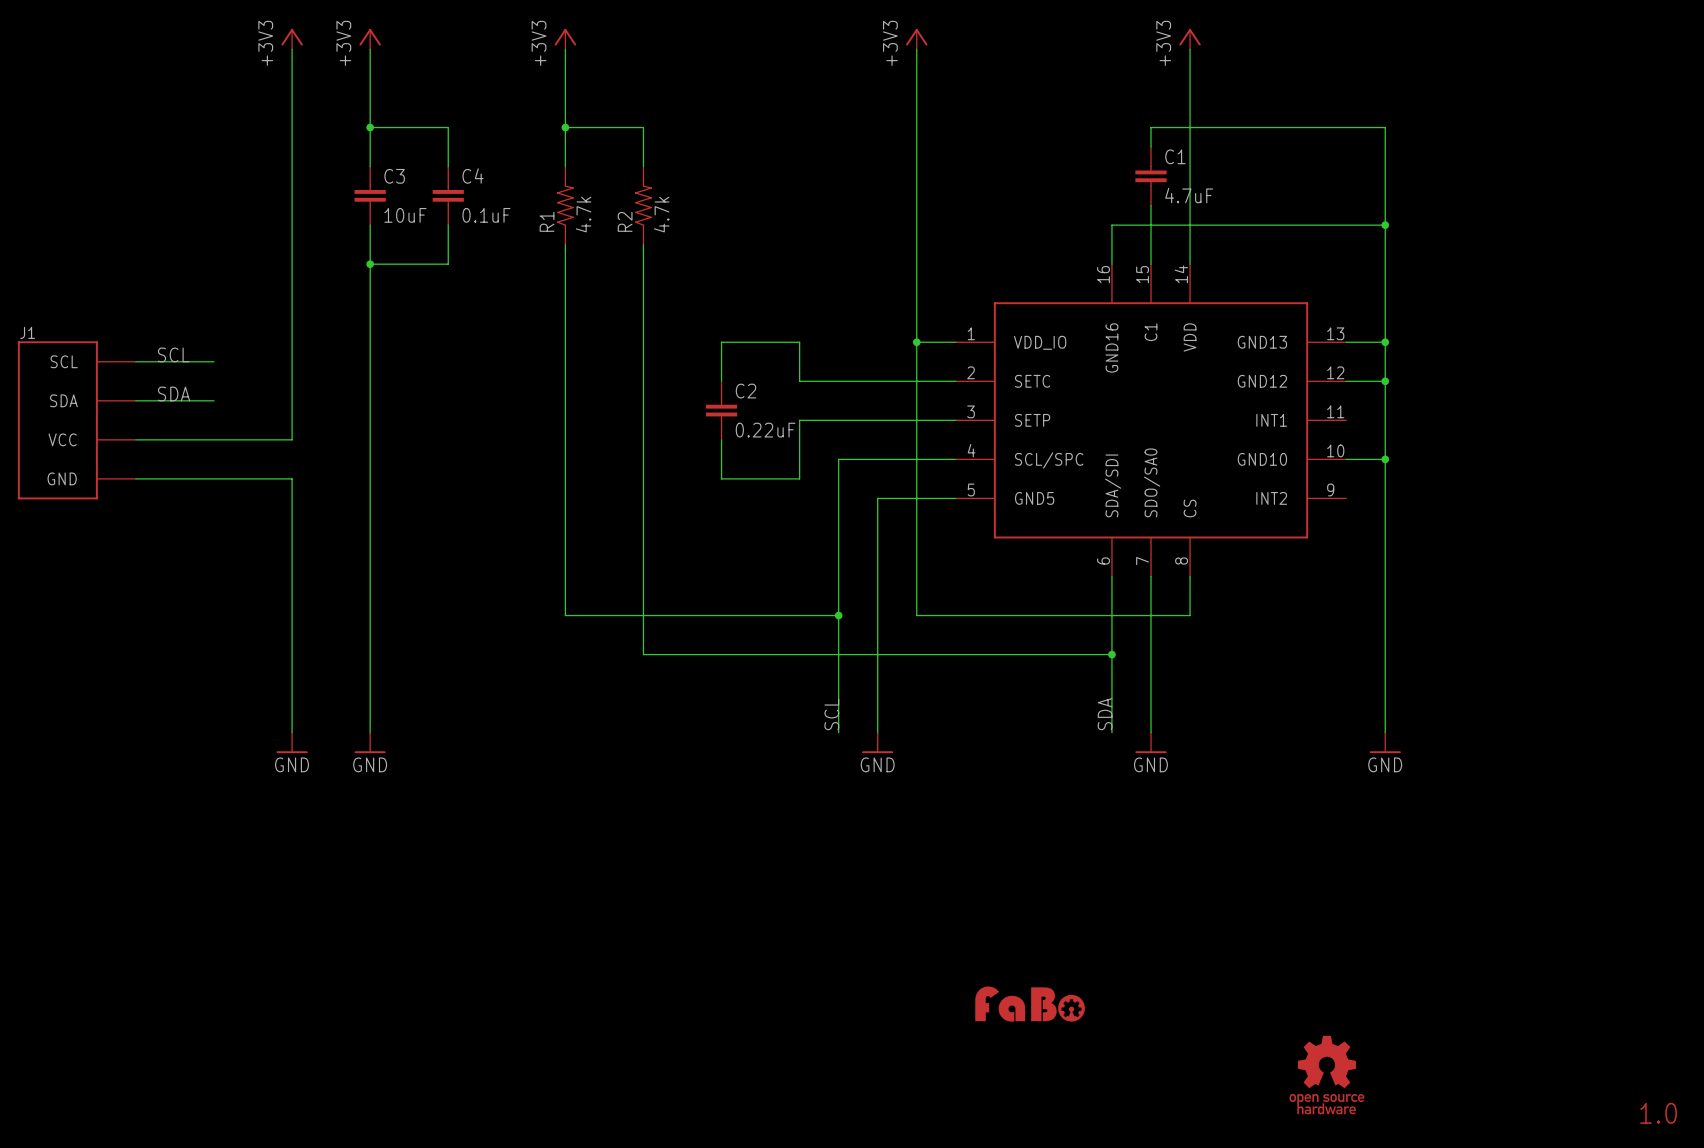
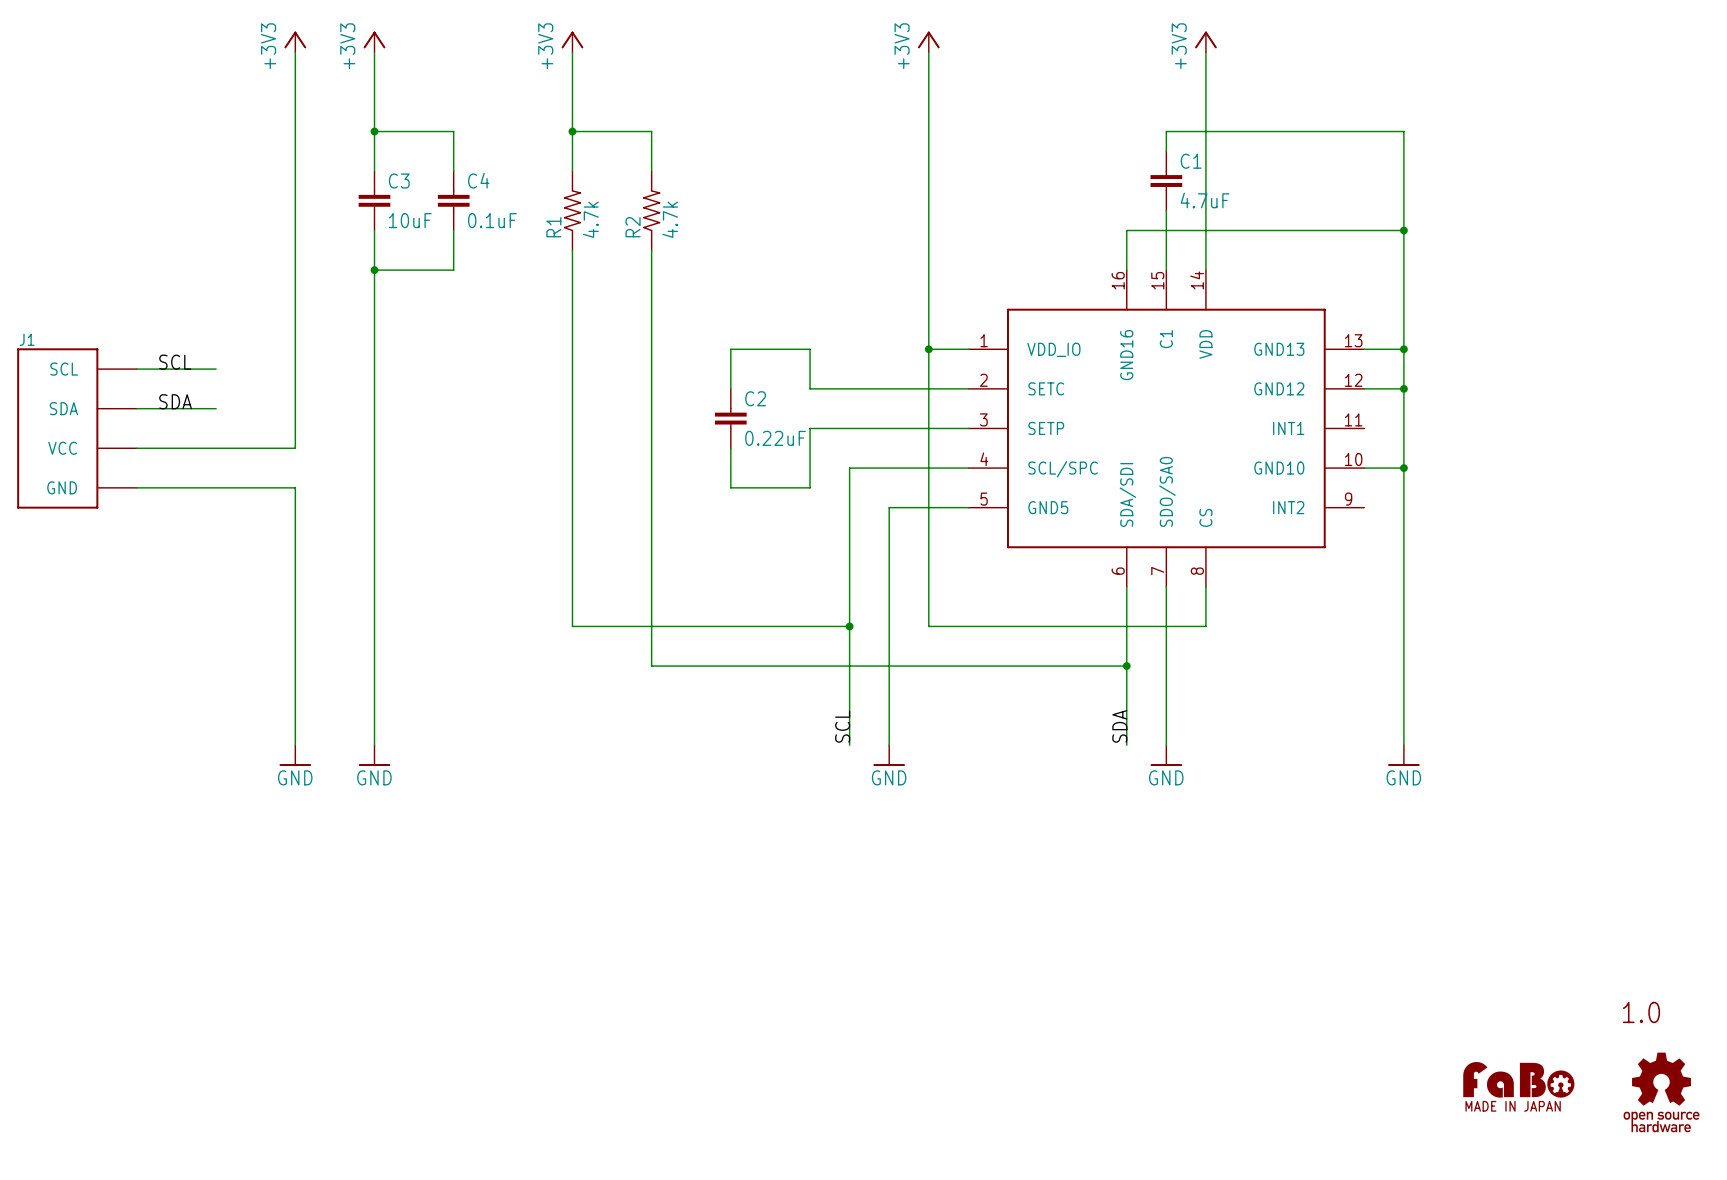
part: (1030, 1004) -> none
part: none -> (1518, 1079)
part: (1326, 1075) -> none
part: none -> (1661, 1092)
text position: 1.0 (1658, 1113) -> 1.0 (1641, 1012)

